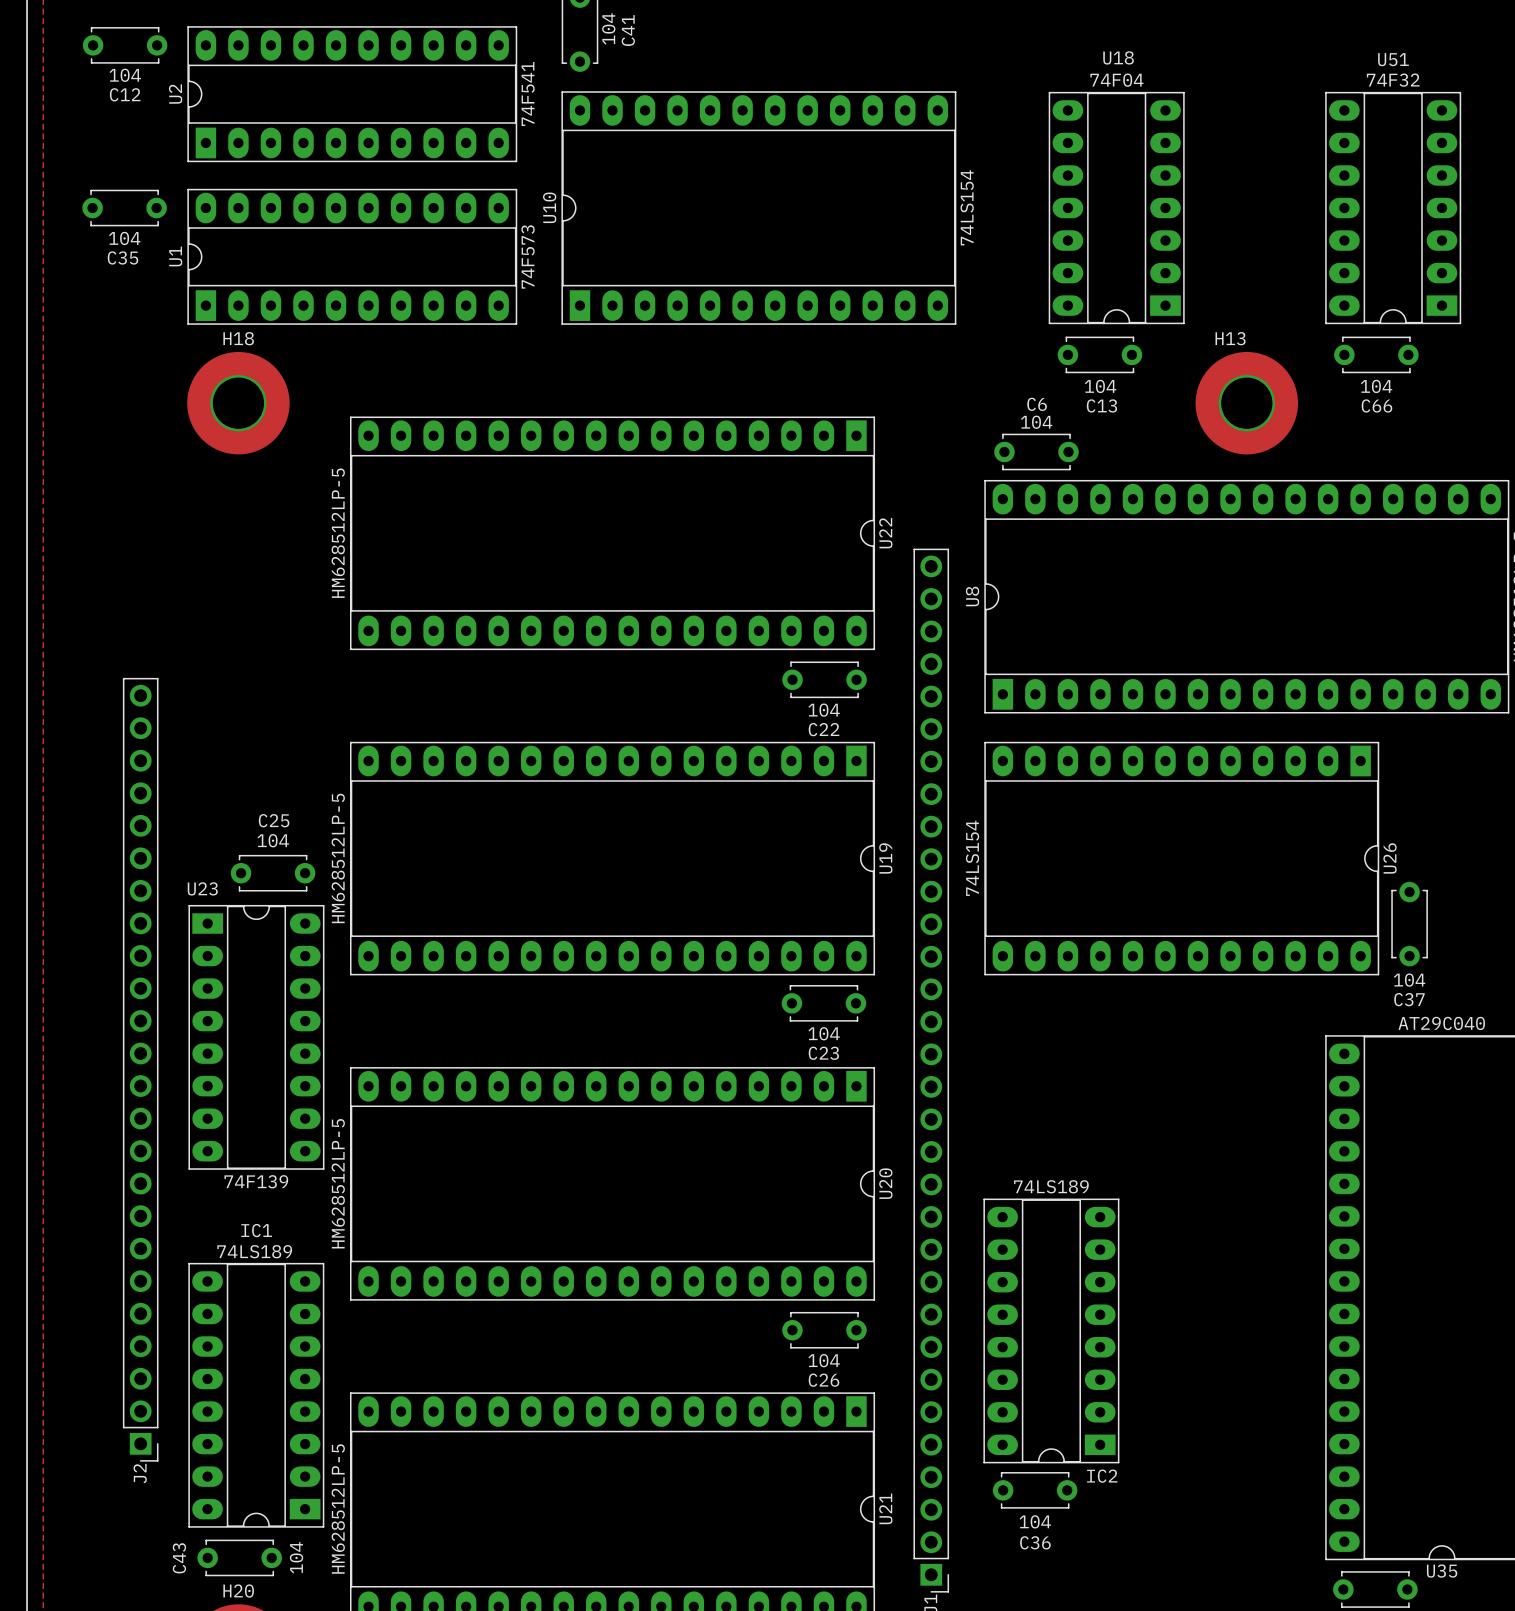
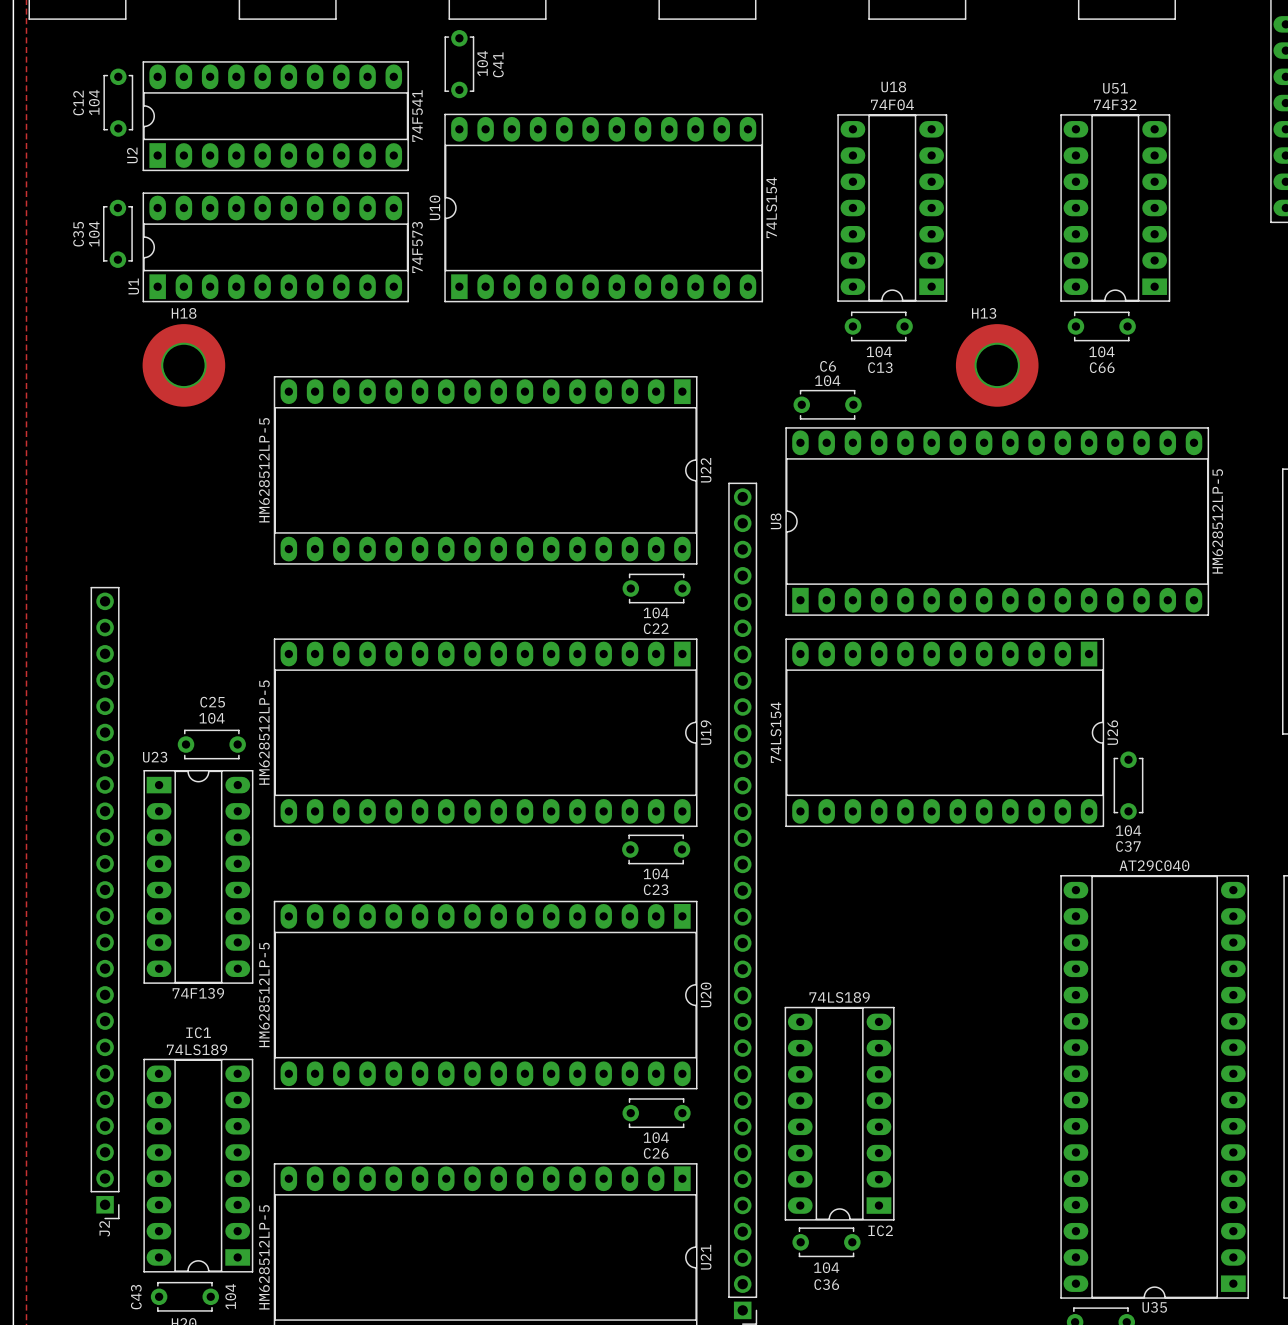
C12 rotation: 0° (125, 45) -> 90° clockwise (118, 102)
U2 name position: U2 (175, 94) -> U2 (132, 155)
C35 rotation: 0° (124, 208) -> 90° clockwise (117, 233)
U1 name position: U1 (175, 256) -> U1 (133, 286)

